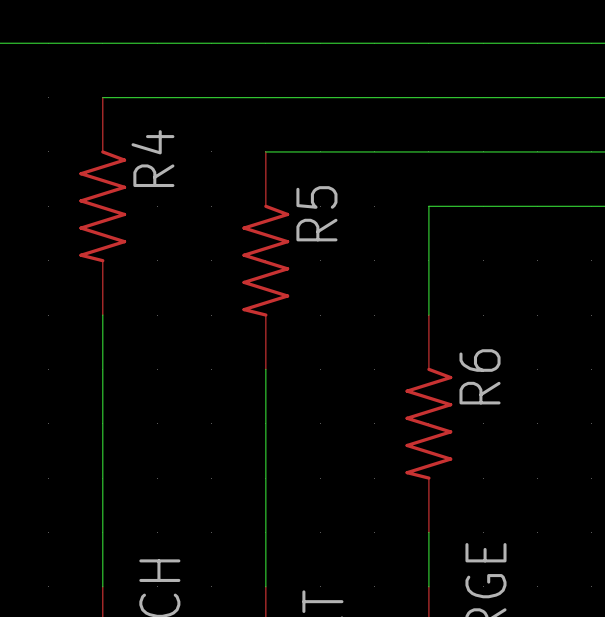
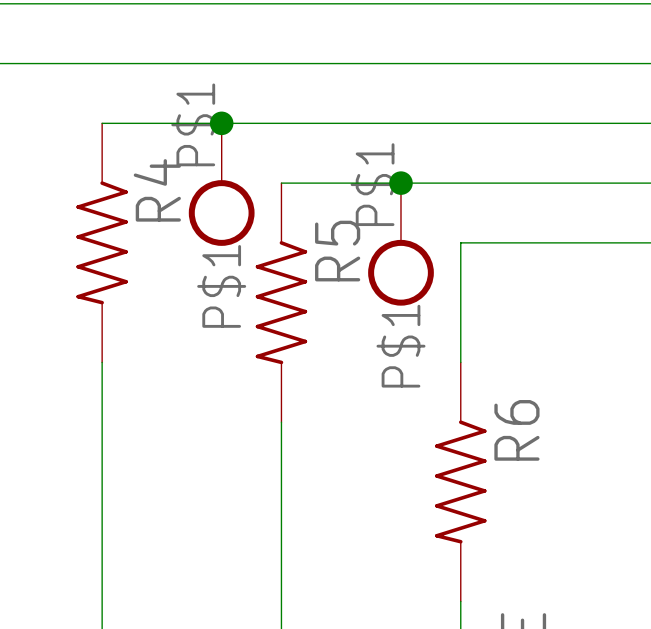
junction: none -> (221, 123)
junction: none -> (400, 183)
part: none -> (221, 184)
part: none -> (400, 244)

